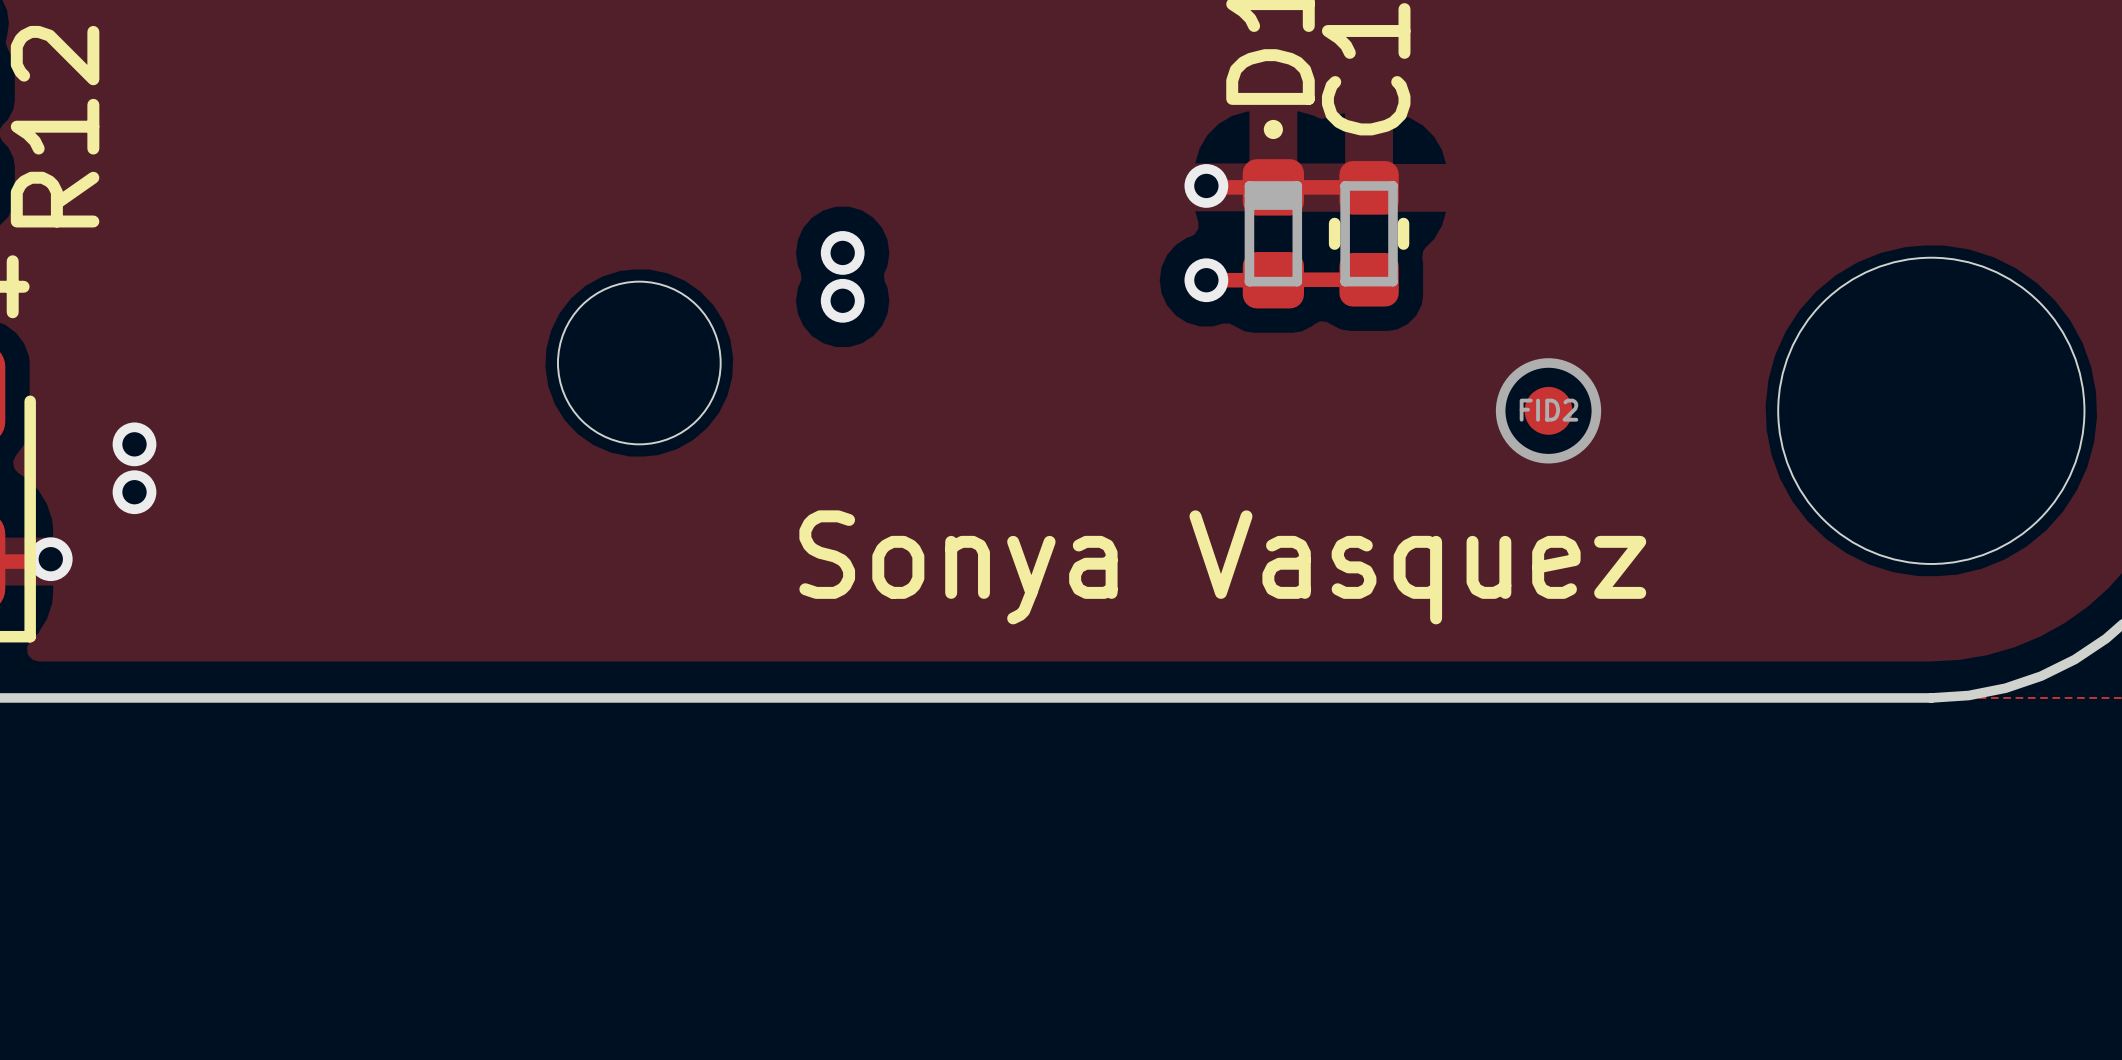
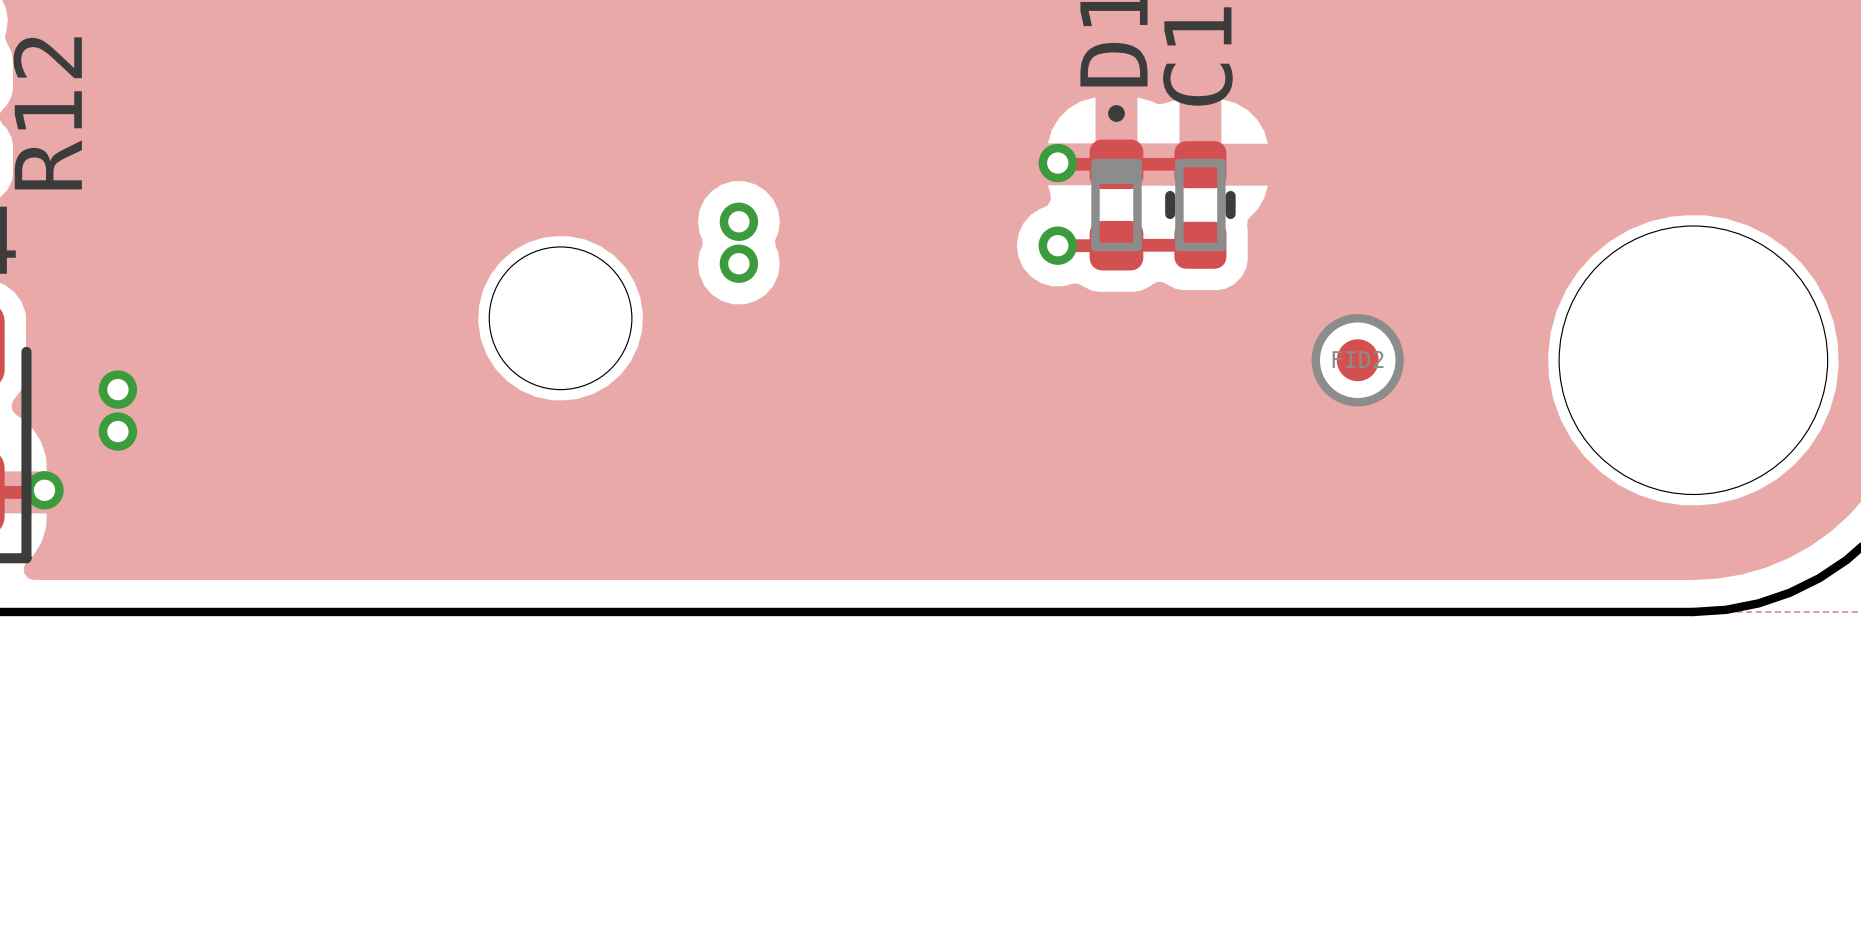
text: Sonya Vasquez (1222, 567) -> none

